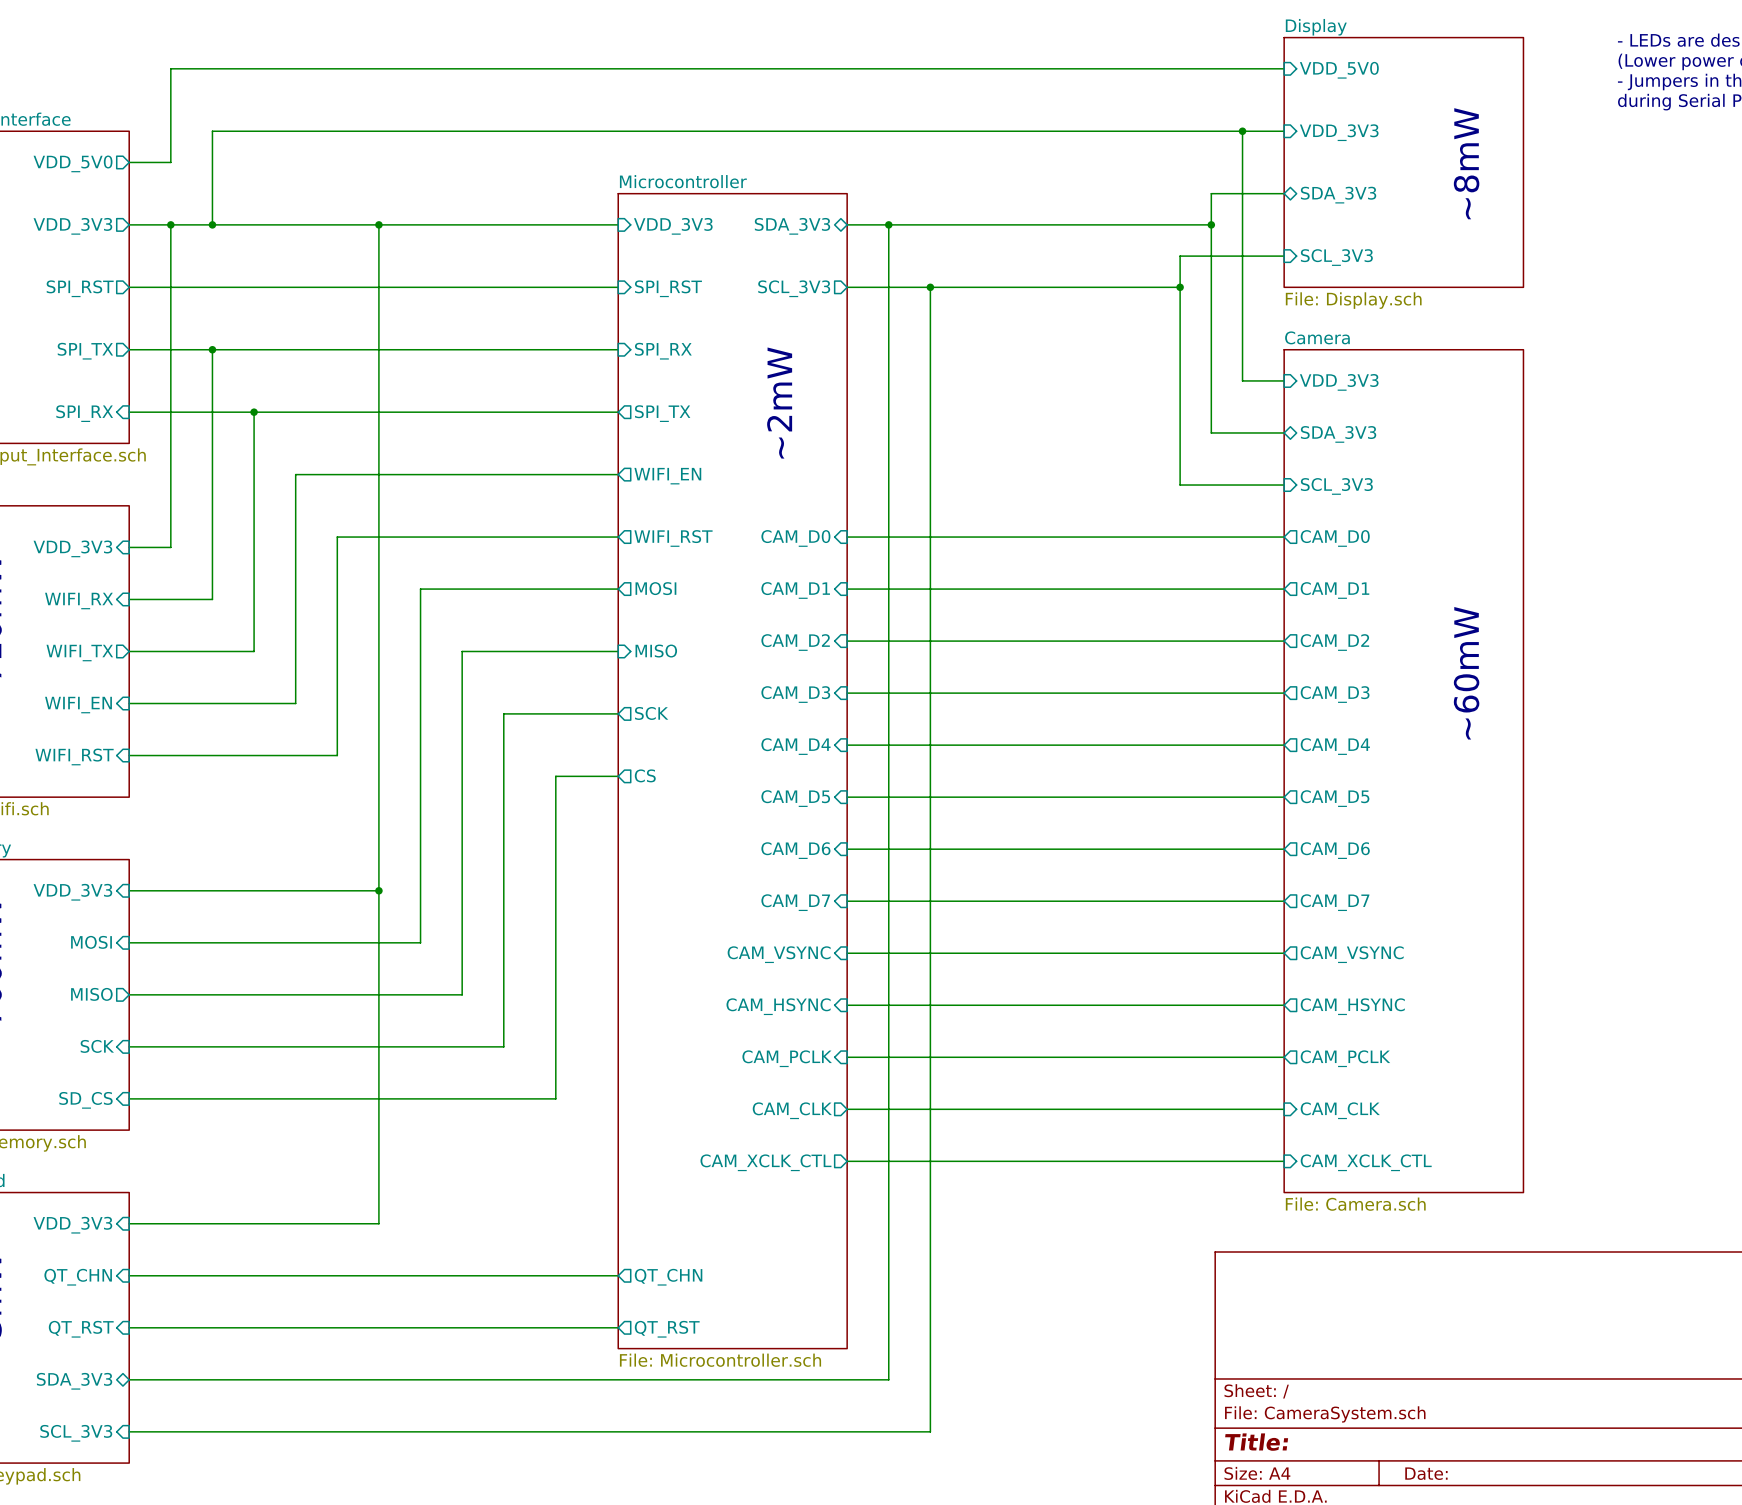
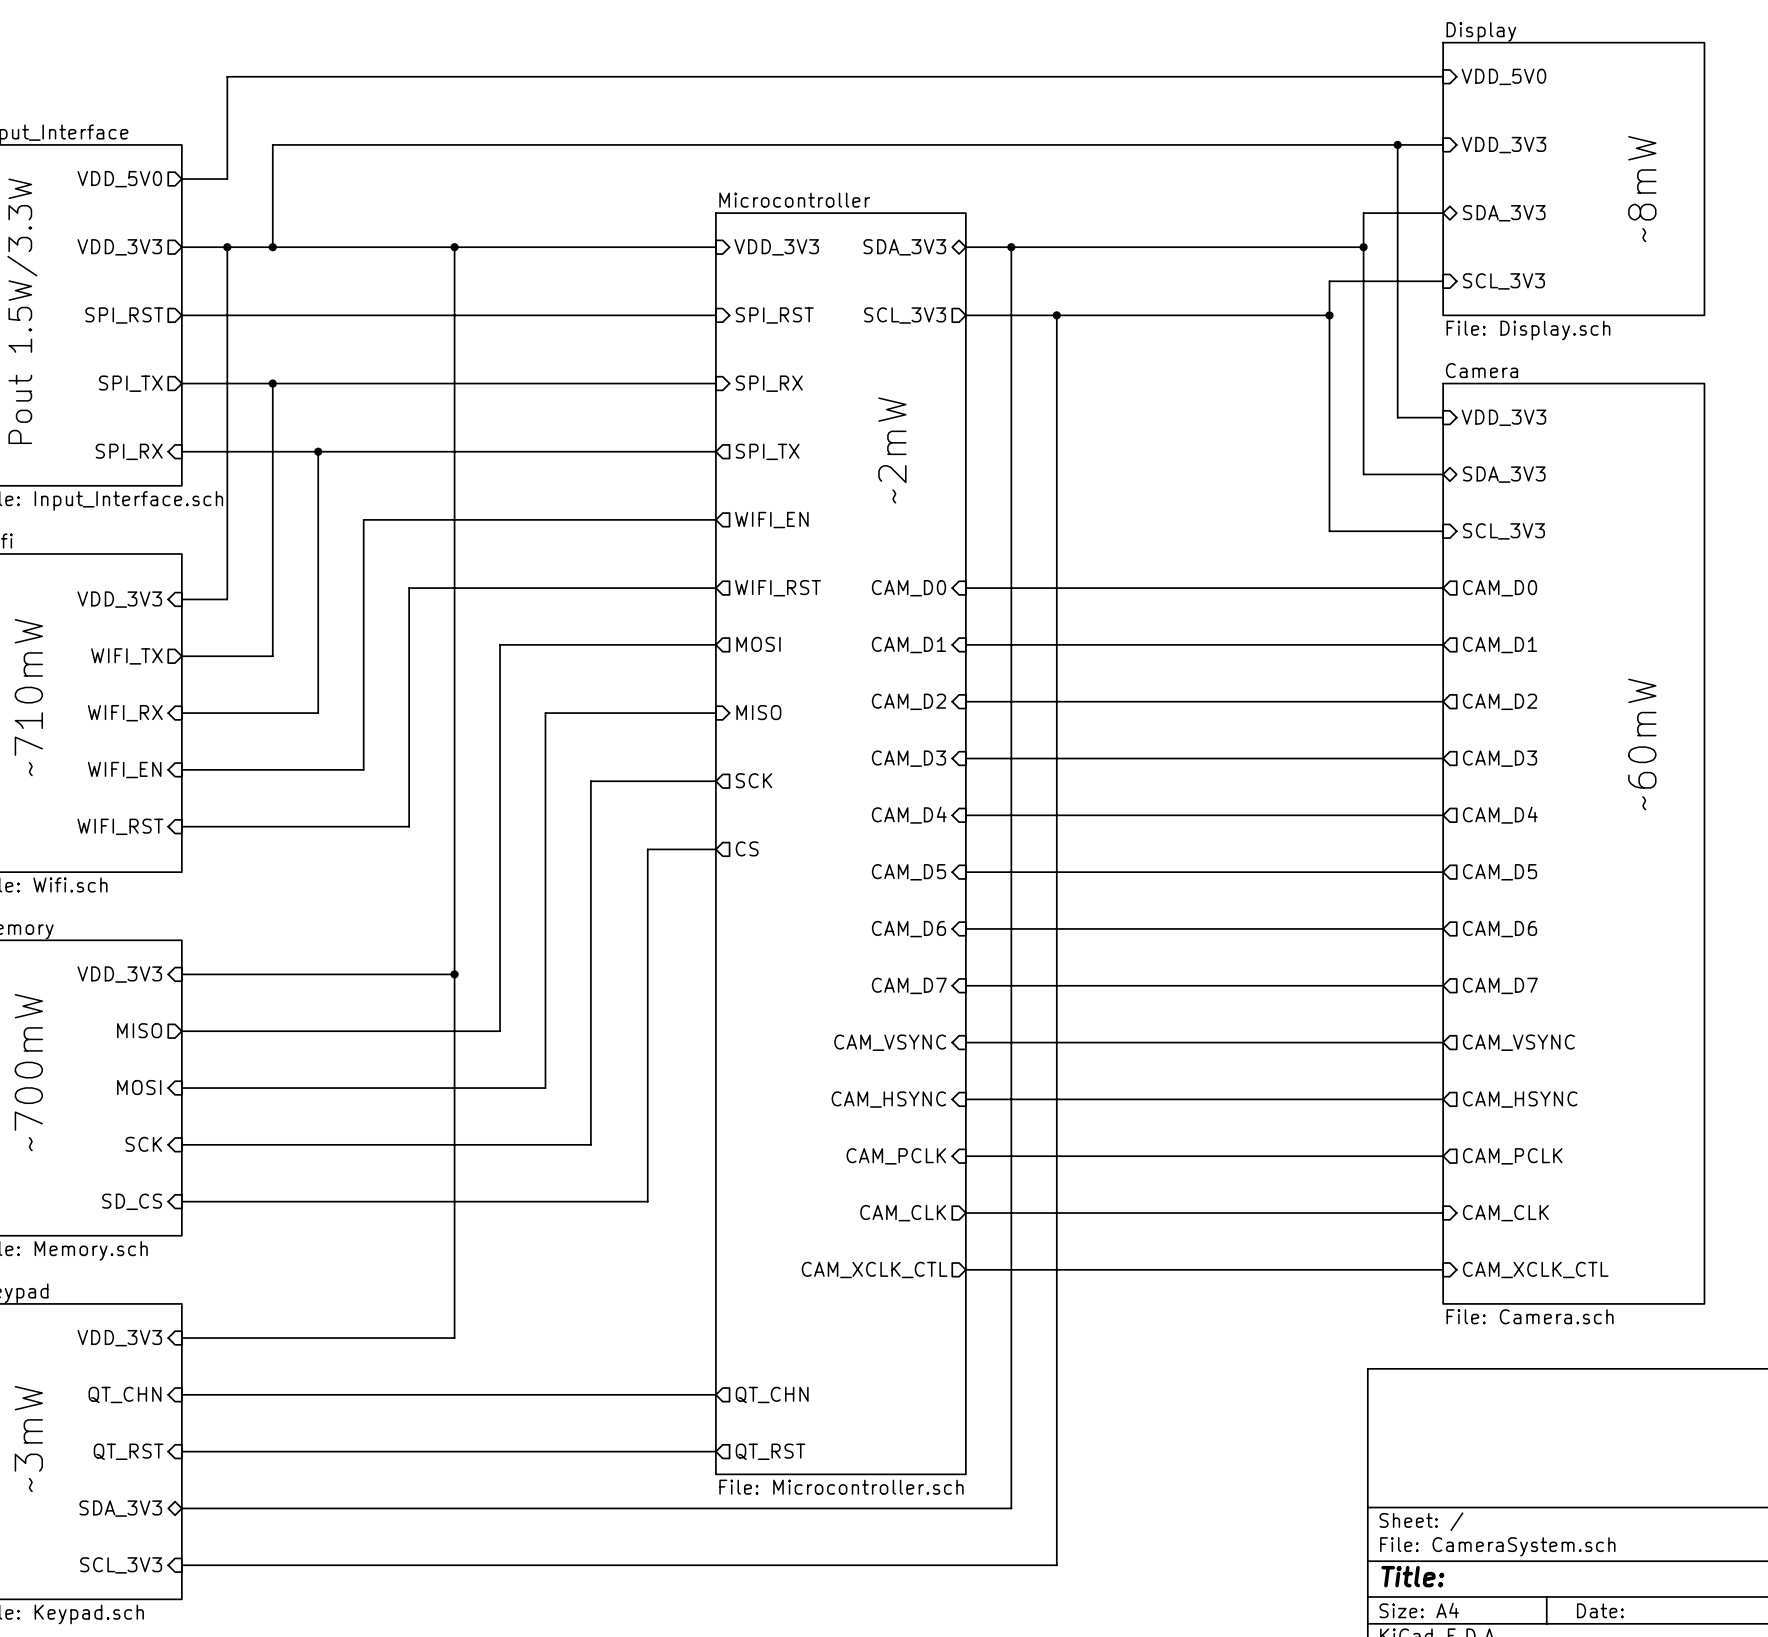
sheet pin shape: input (79, 601) -> output (126, 656)
sheet pin: WIFI_RX (79, 601) -> WIFI_TX (126, 656)
sheet pin shape: output (79, 653) -> input (125, 713)
sheet pin: WIFI_TX (79, 653) -> WIFI_RX (125, 713)
sheet pin shape: input (91, 942) -> output (139, 1030)
sheet pin: MOSI (91, 942) -> MISO (139, 1030)
sheet pin shape: output (91, 994) -> input (139, 1087)
sheet pin: MISO (91, 994) -> MOSI (139, 1087)

